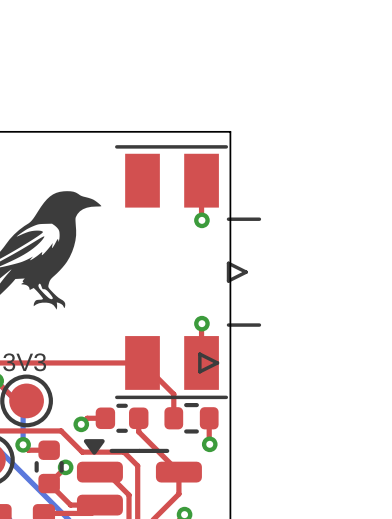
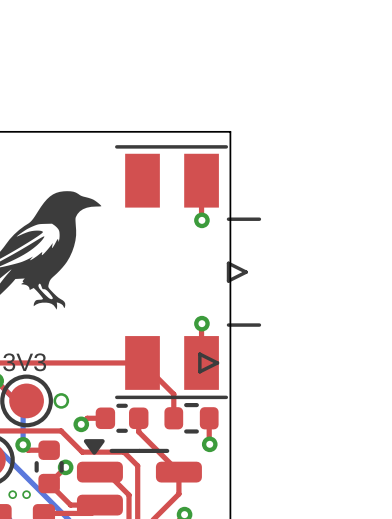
via: none -> (61, 400)
via: none -> (12, 494)
via: none -> (26, 494)

